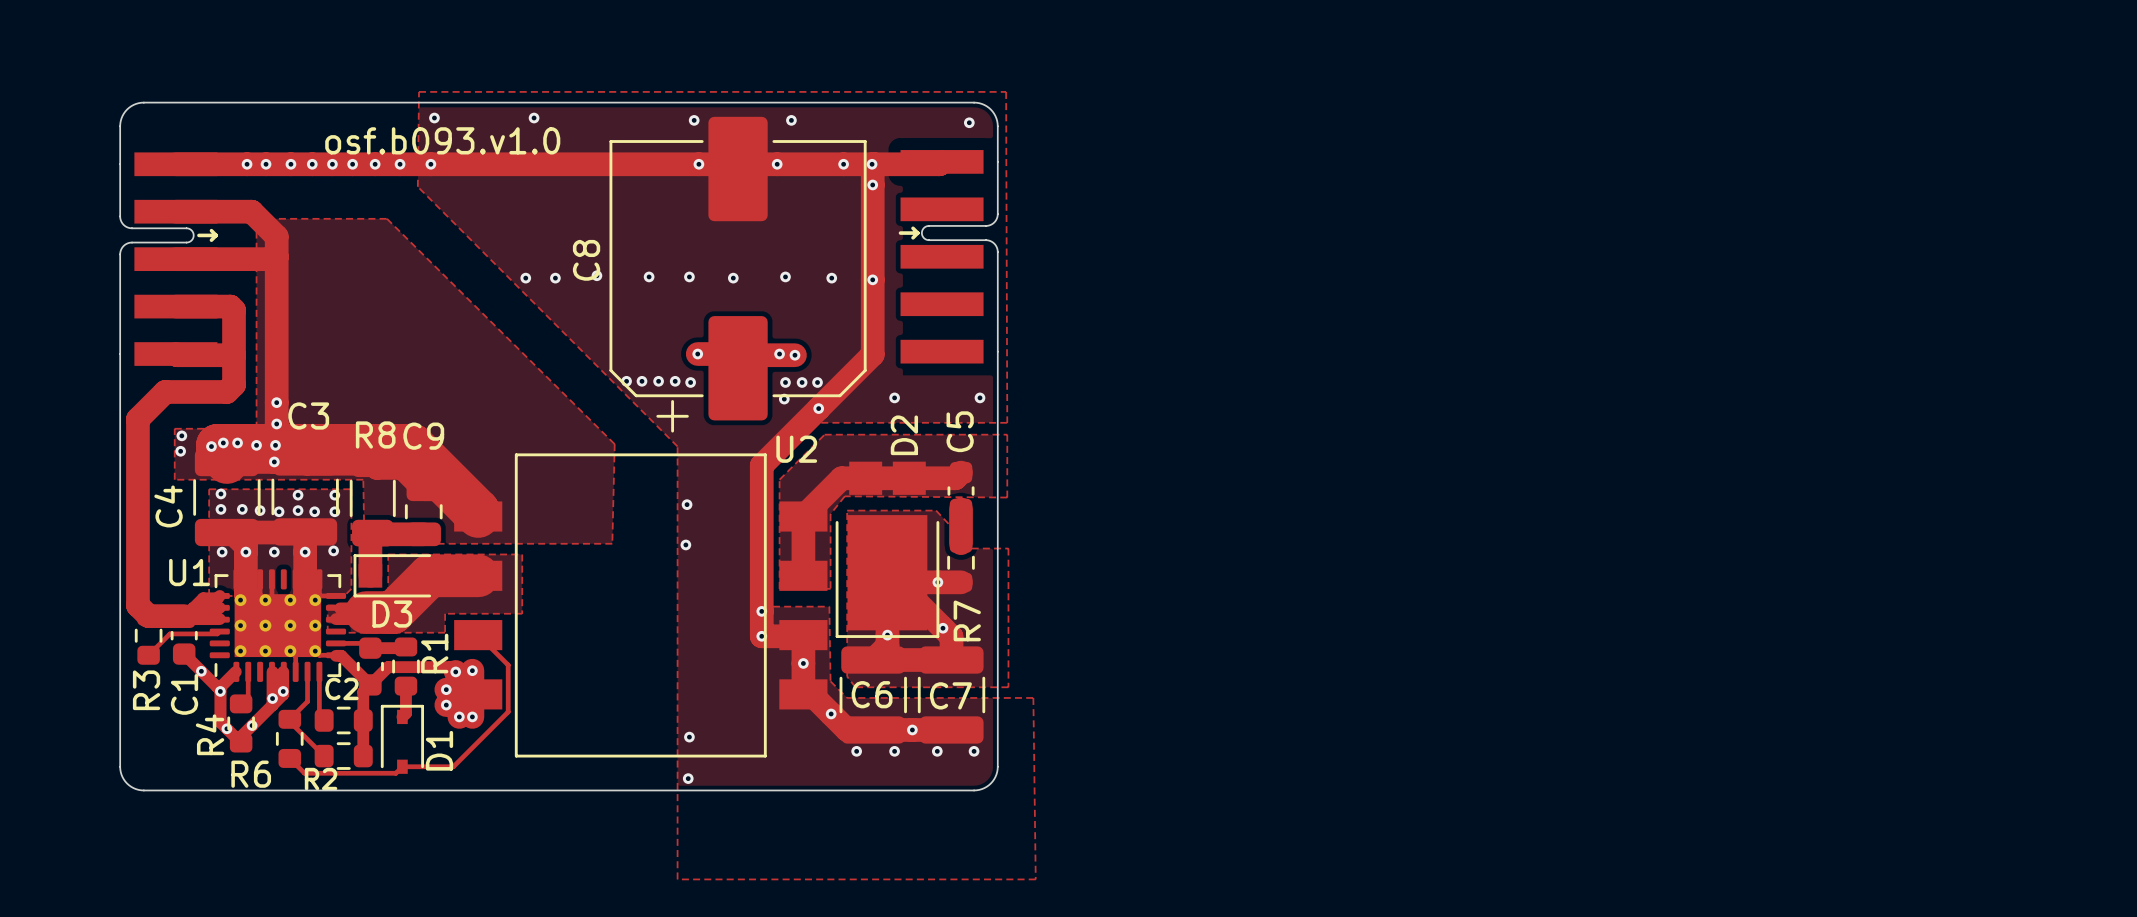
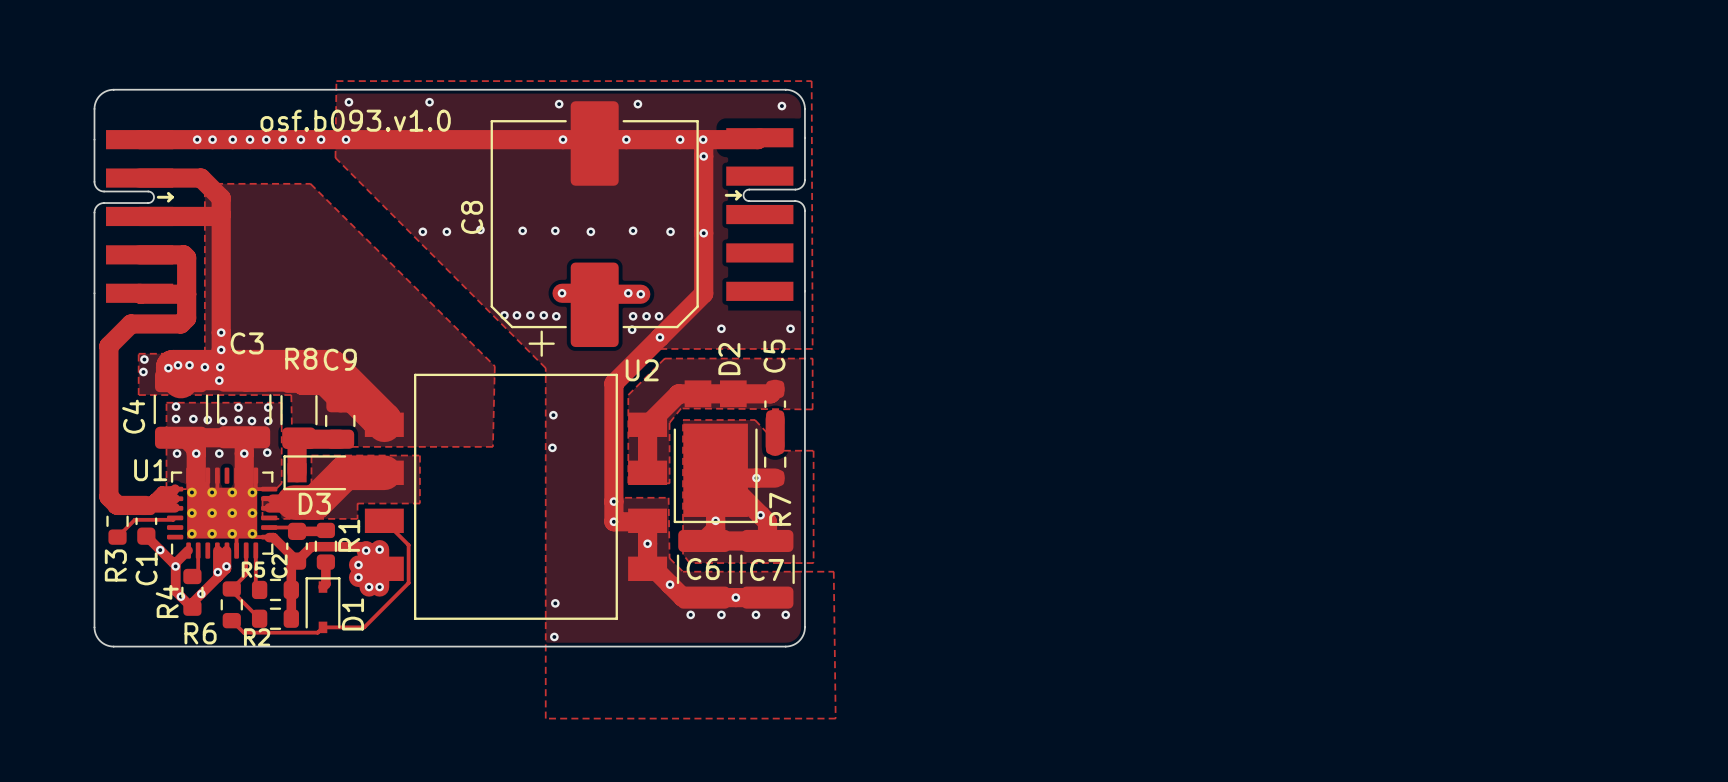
C2 name rotation: 0° (341, 688) -> 90° counterclockwise (279, 566)
R5 name: none -> R5 (253, 569)

